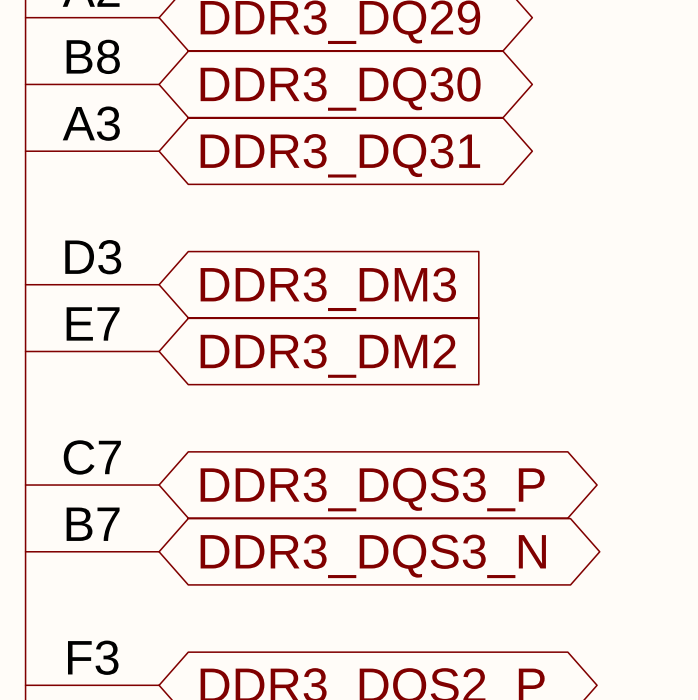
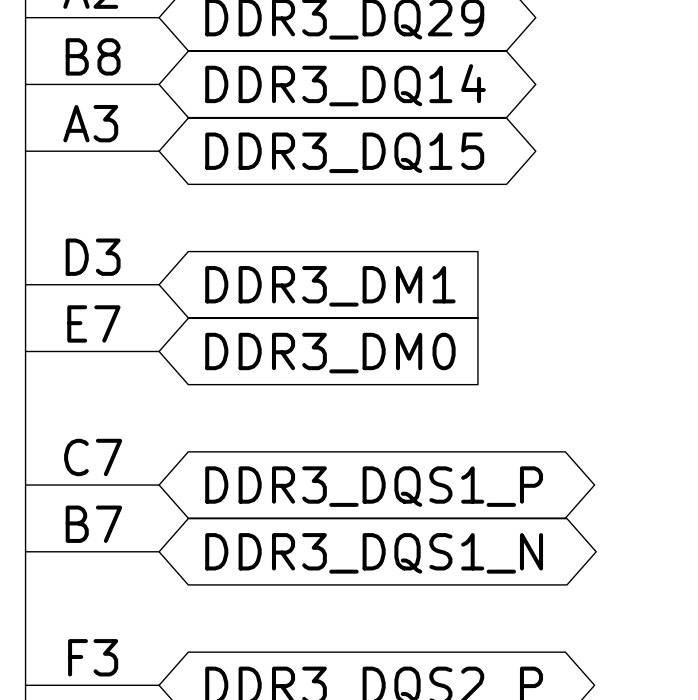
global label: DDR3_DQ30 (340, 89) -> DDR3_DQ14 (345, 85)
global label: DDR3_DQ31 (340, 155) -> DDR3_DQ15 (344, 152)
global label: DDR3_DM3 (328, 289) -> DDR3_DM1 (330, 286)
global label: DDR3_DM2 (328, 356) -> DDR3_DM0 (330, 353)
global label: DDR3_DQS3_P (372, 489) -> DDR3_DQS1_P (374, 486)
global label: DDR3_DQS3_N (373, 556) -> DDR3_DQS1_N (374, 553)

